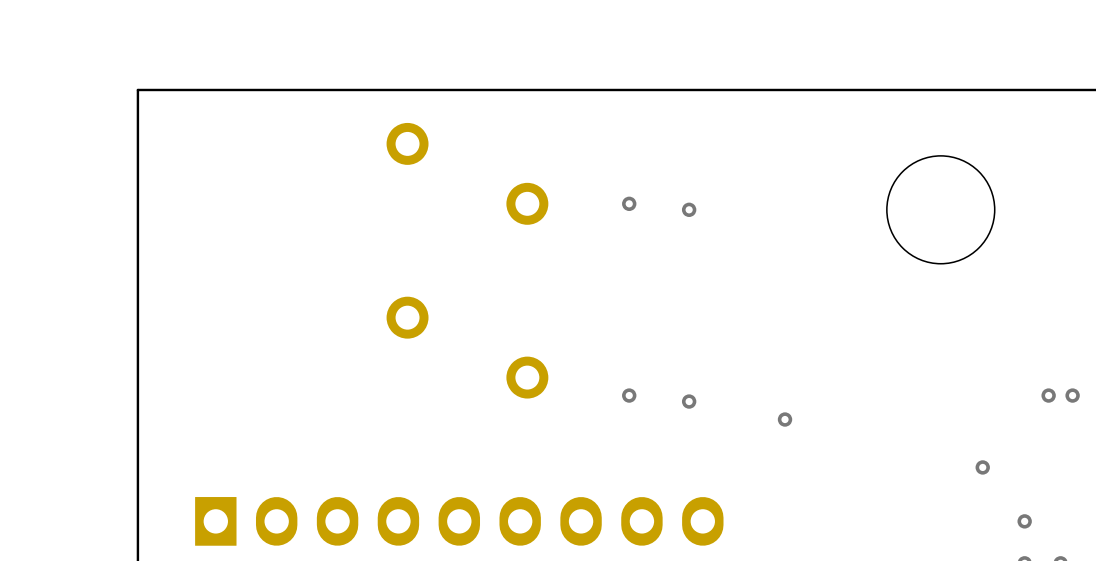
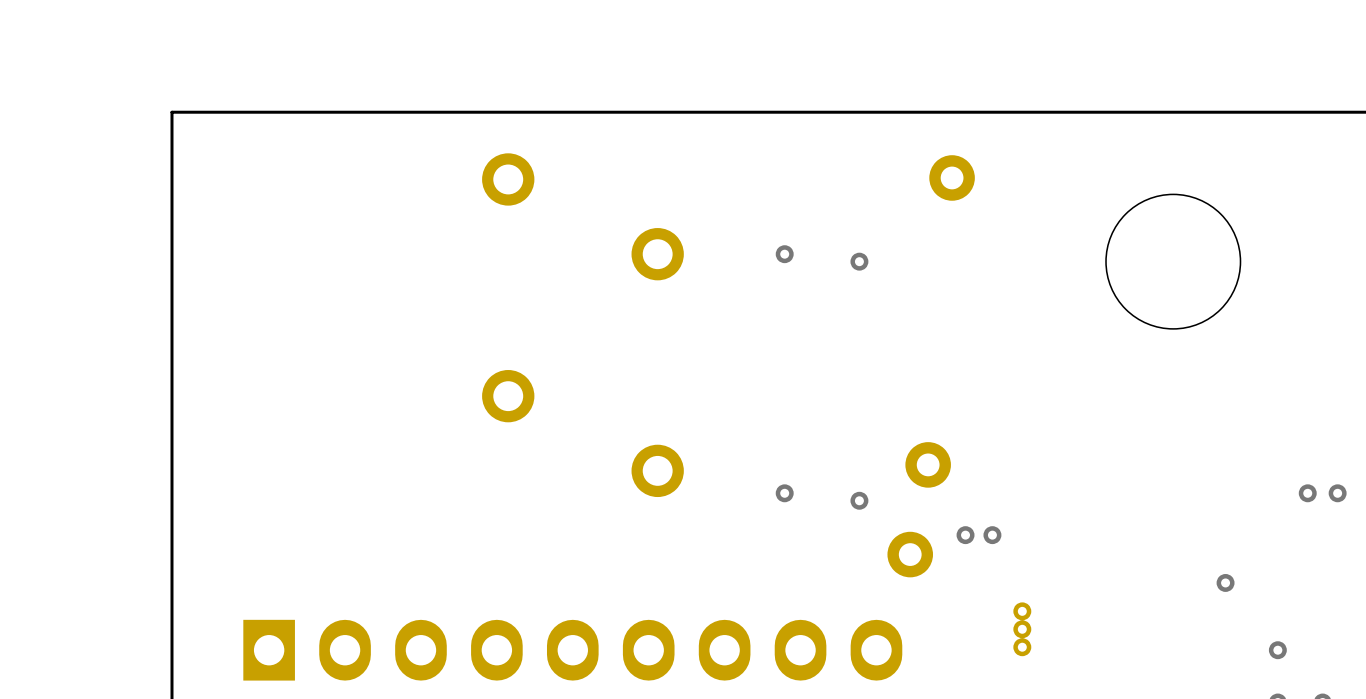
part: none -> (952, 177)
part: none -> (928, 464)
via: (785, 419) -> none
via: none -> (965, 535)
via: none -> (992, 535)
part: none -> (910, 554)
part: none -> (1022, 611)
part: none -> (1022, 629)
part: none -> (1022, 647)

